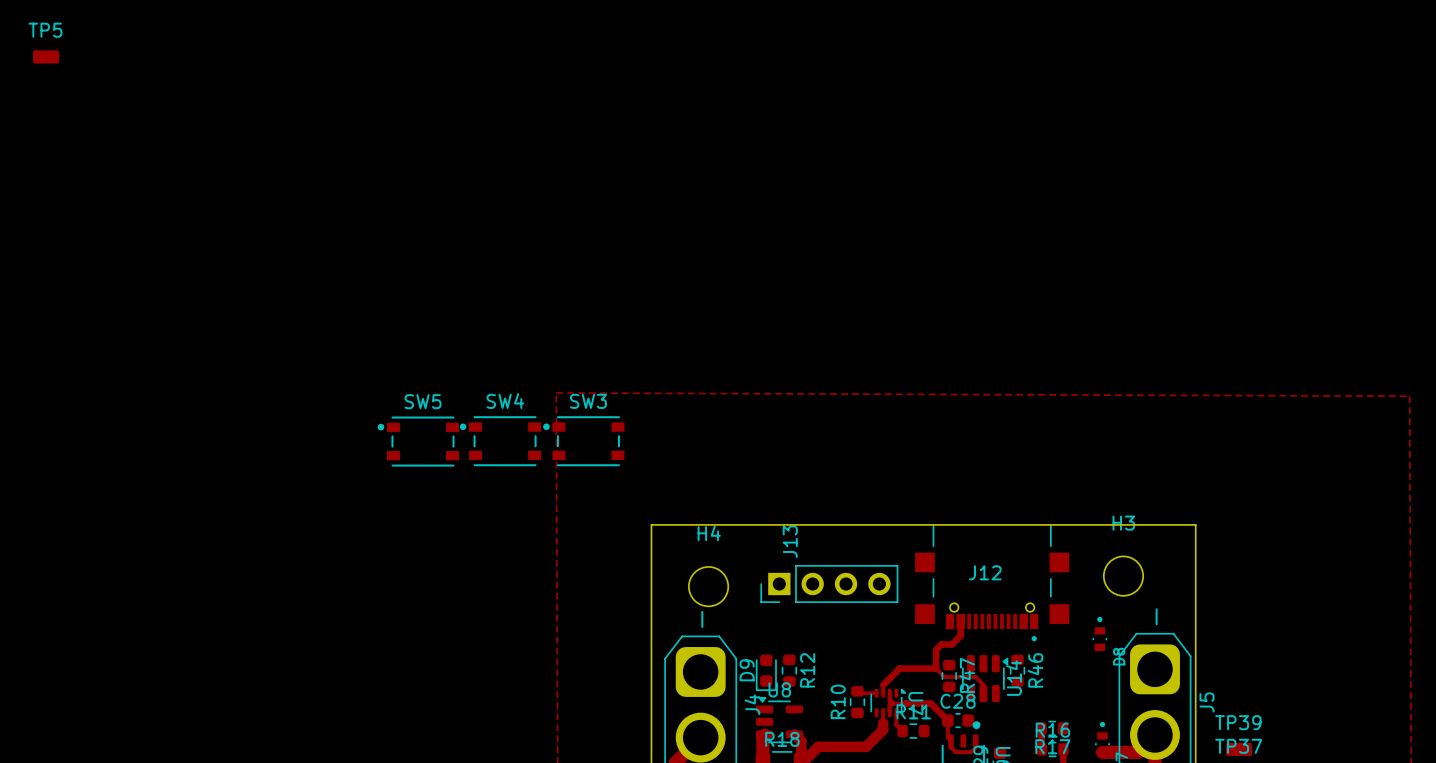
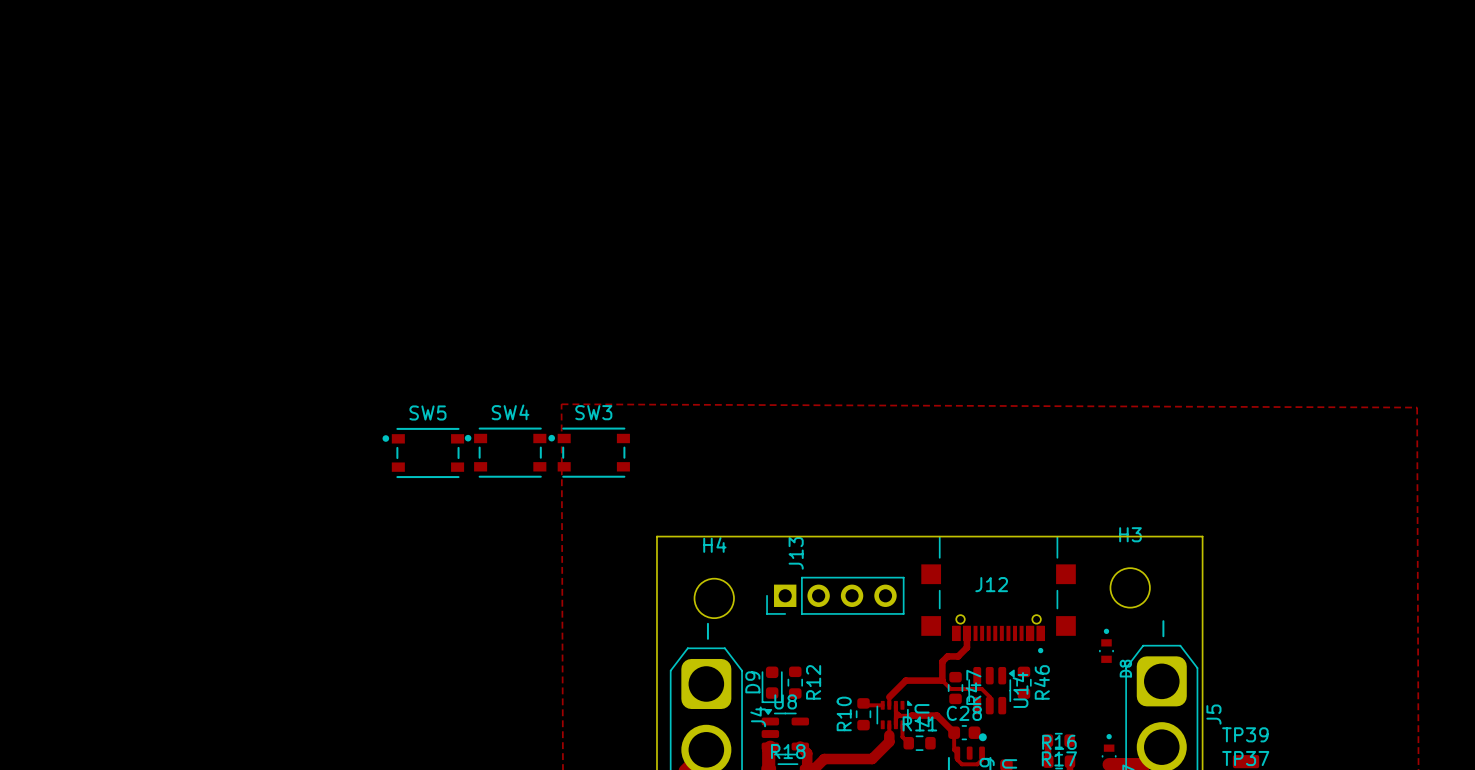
TP5: (46, 56) -> none

